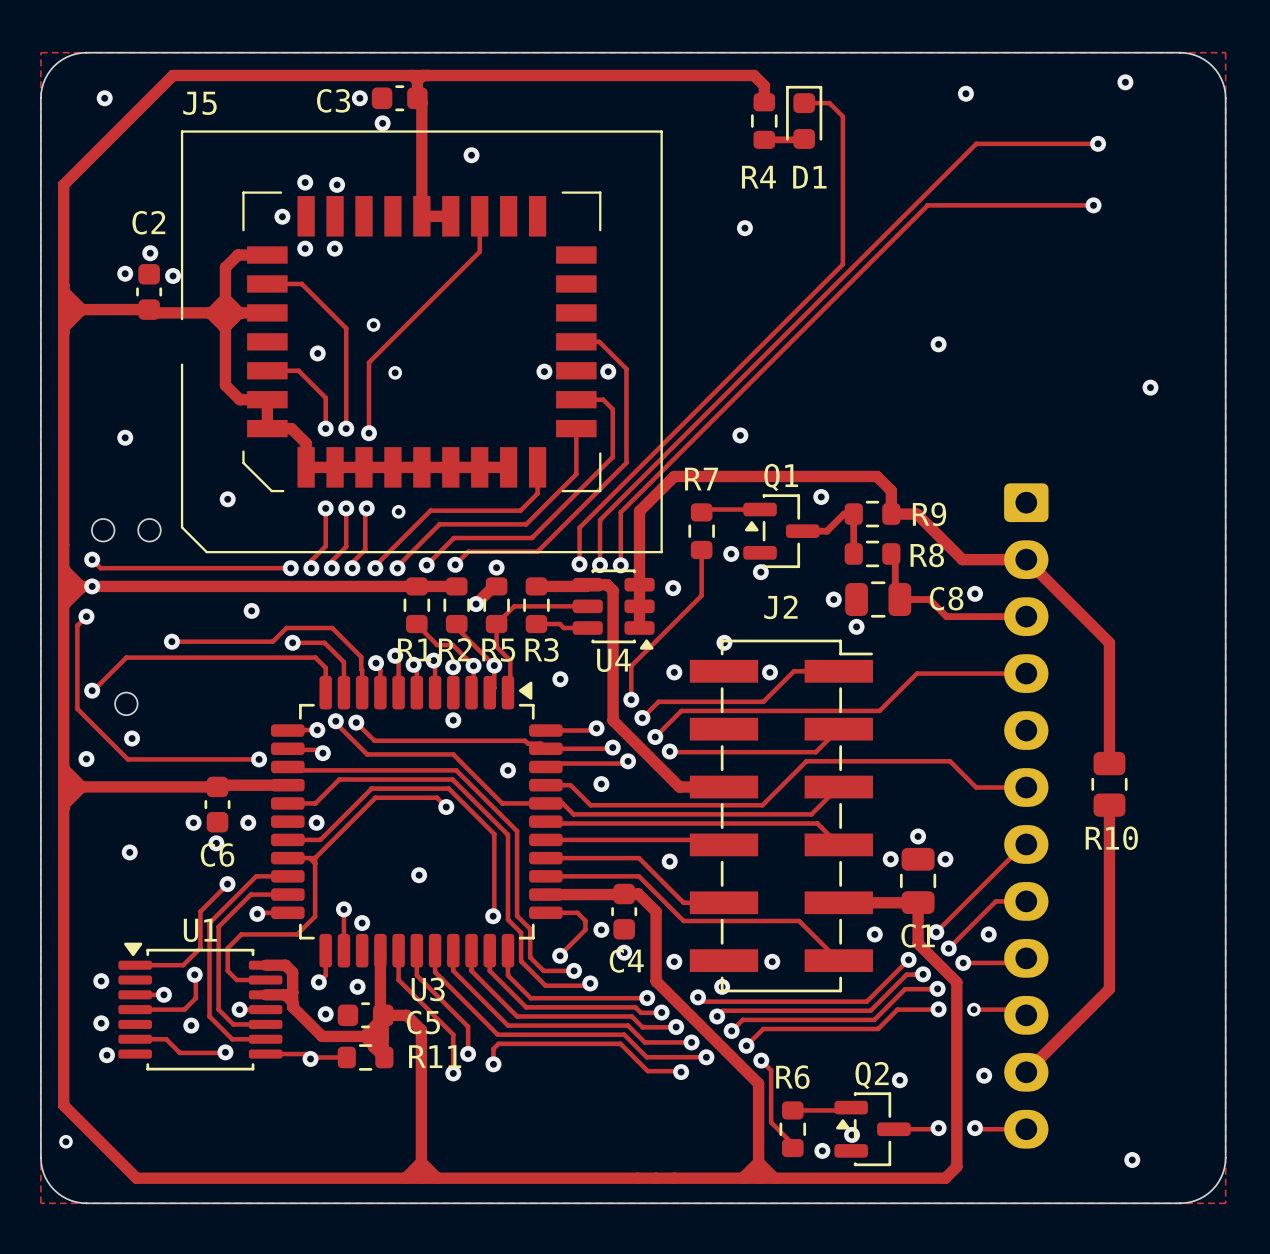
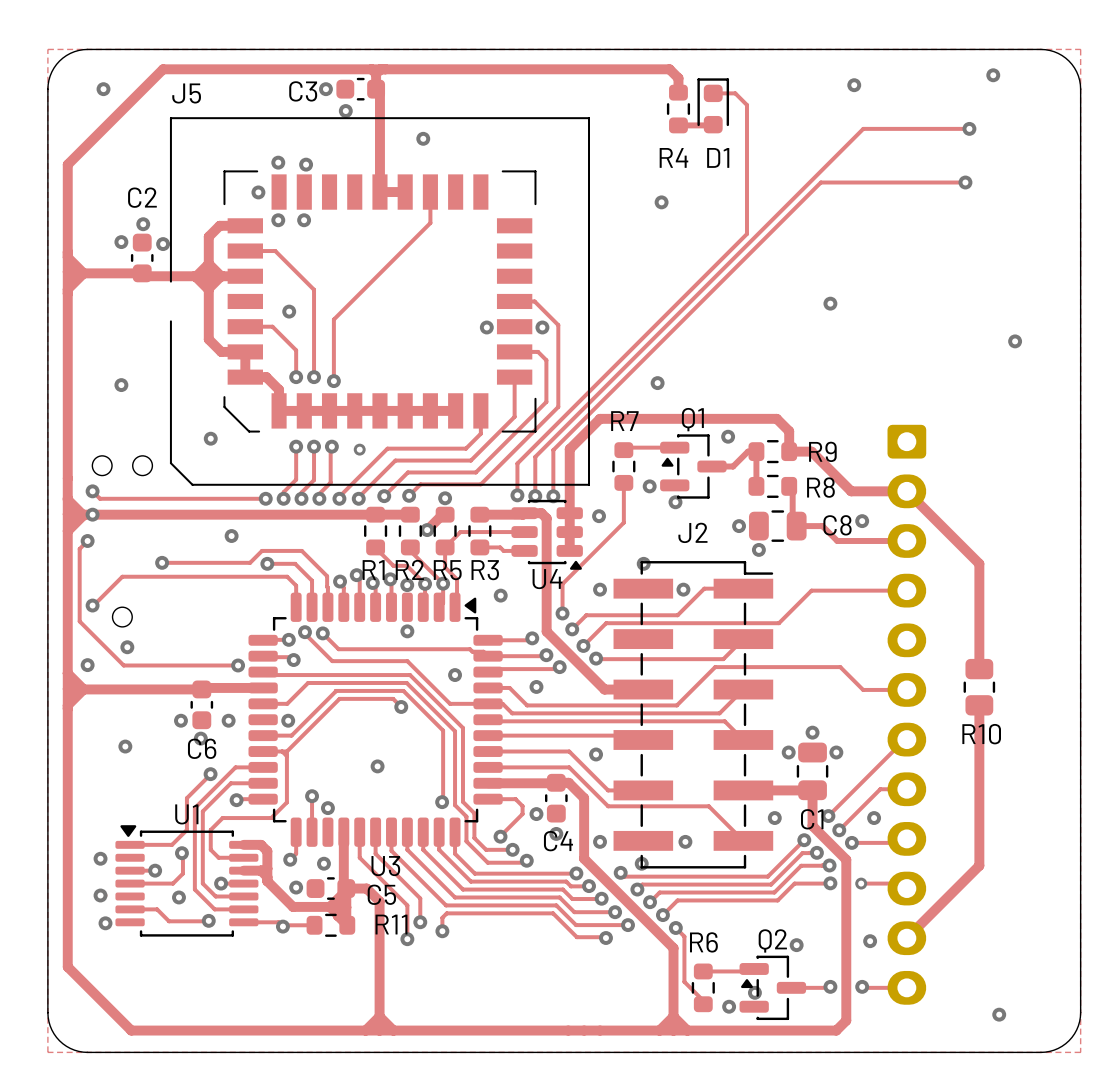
via: (373, 324) -> none
via: (395, 372) -> none
via: (65, 1141) -> none

